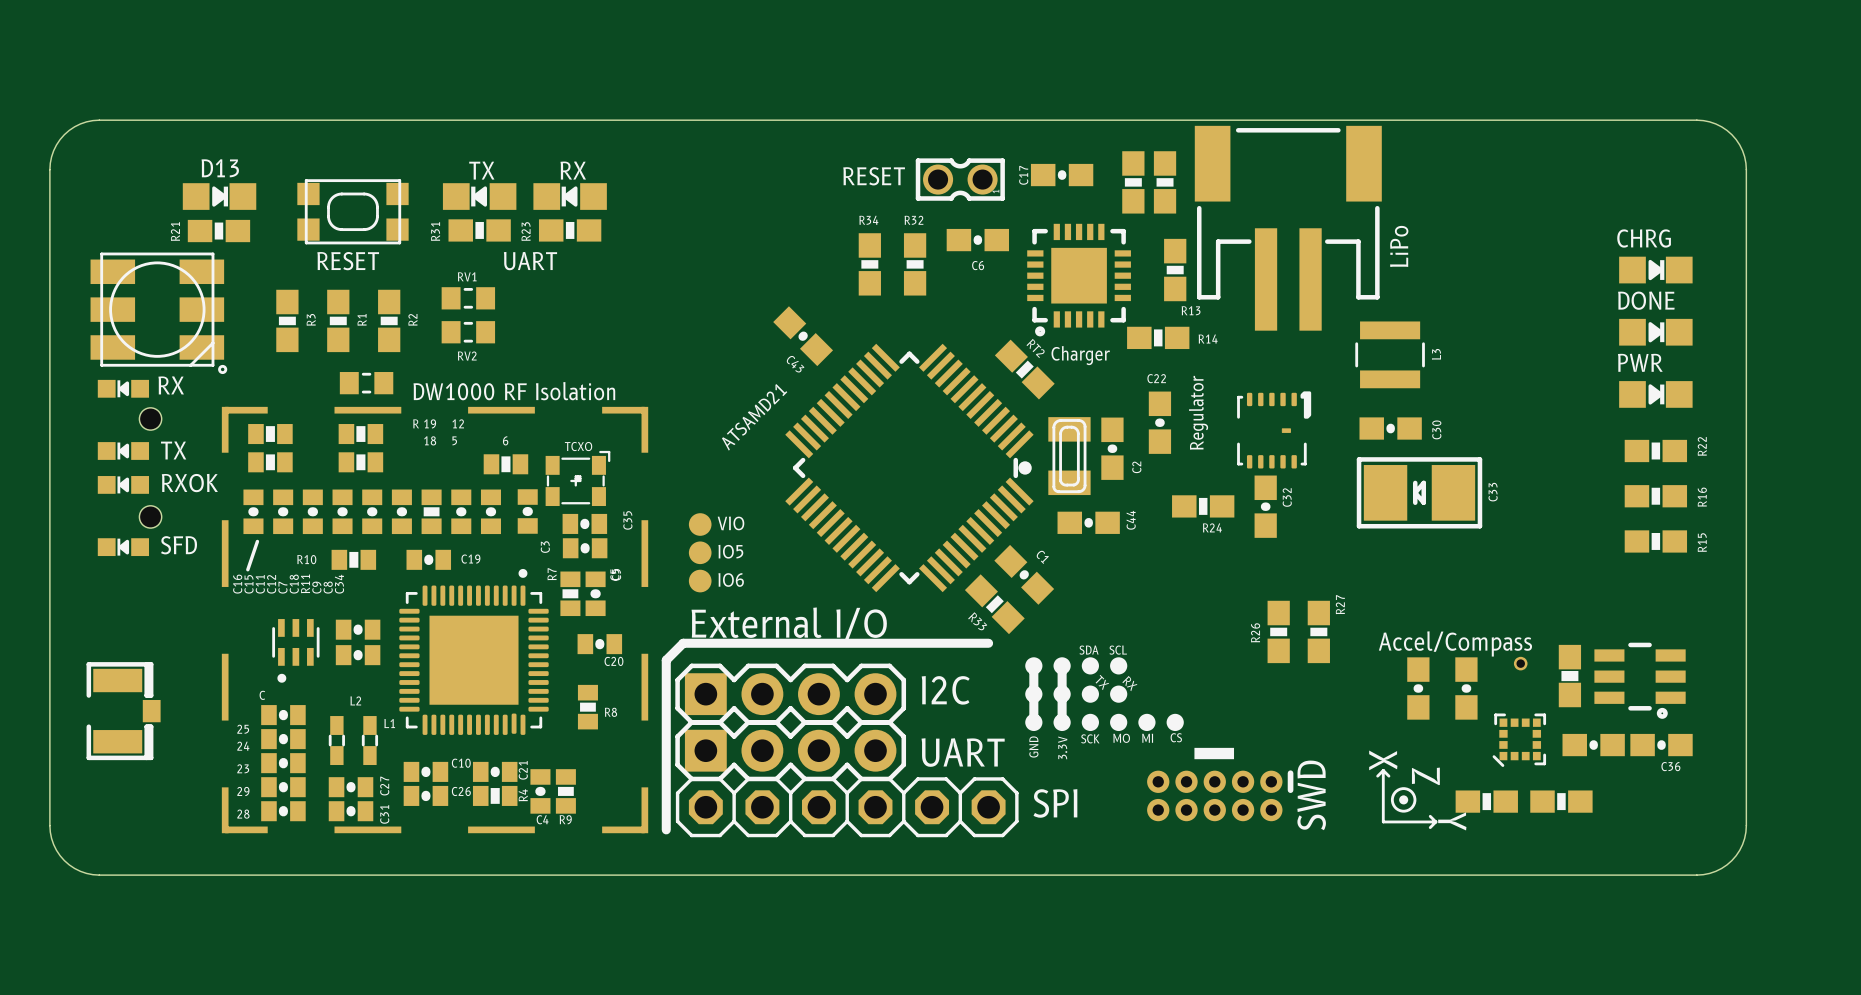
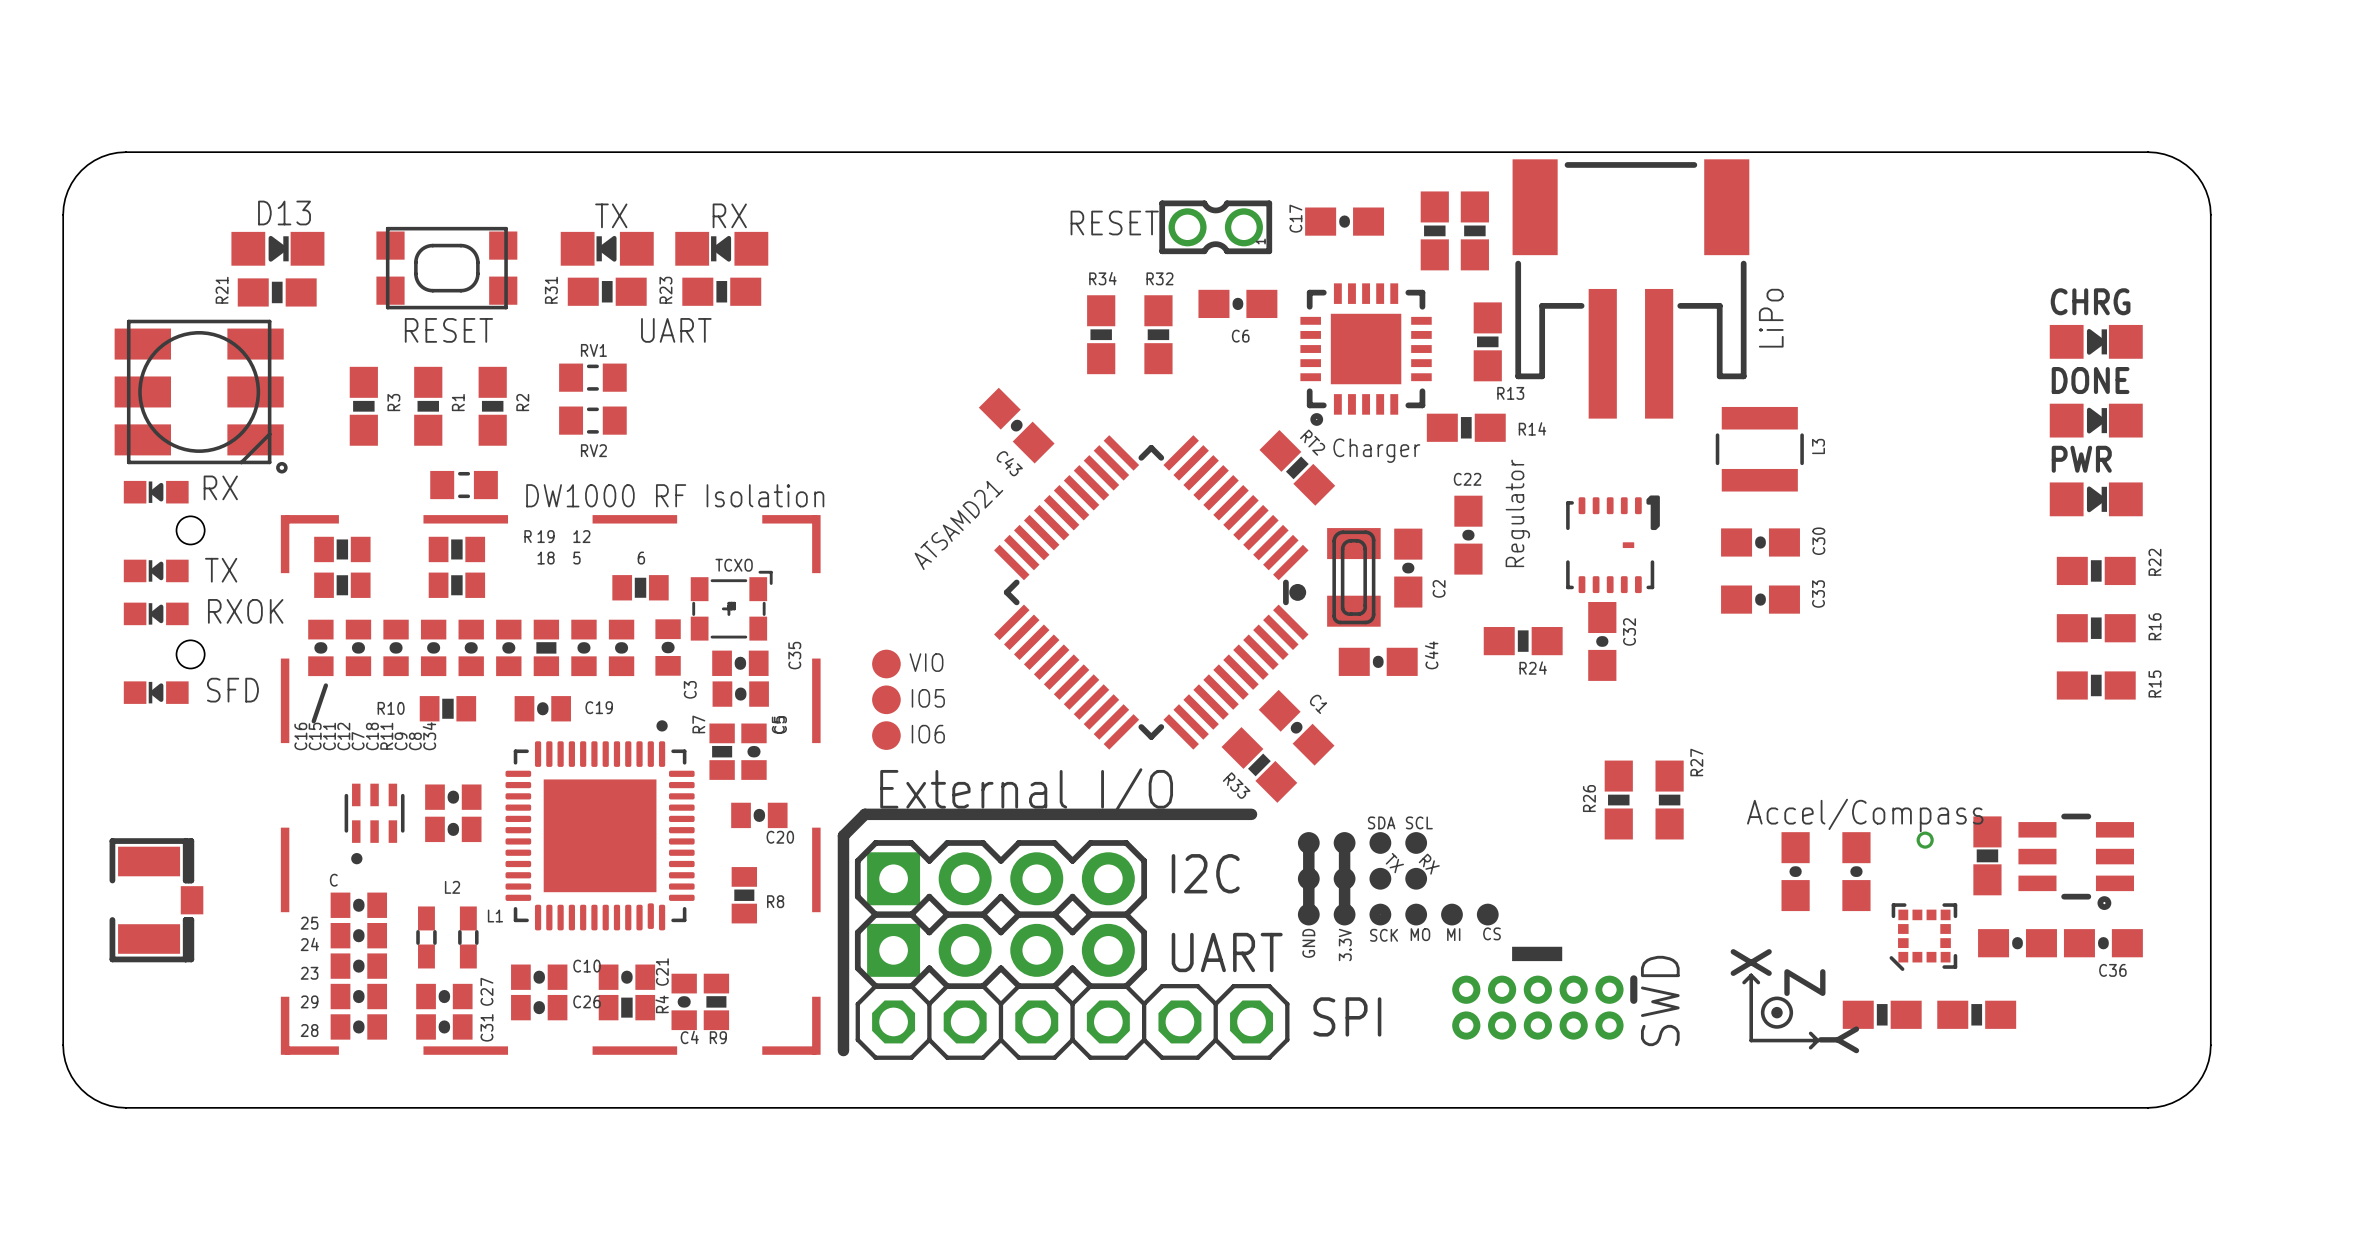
C33: none -> (1760, 599)
part: (1419, 492) -> none
text: C33 (1493, 492) -> none

